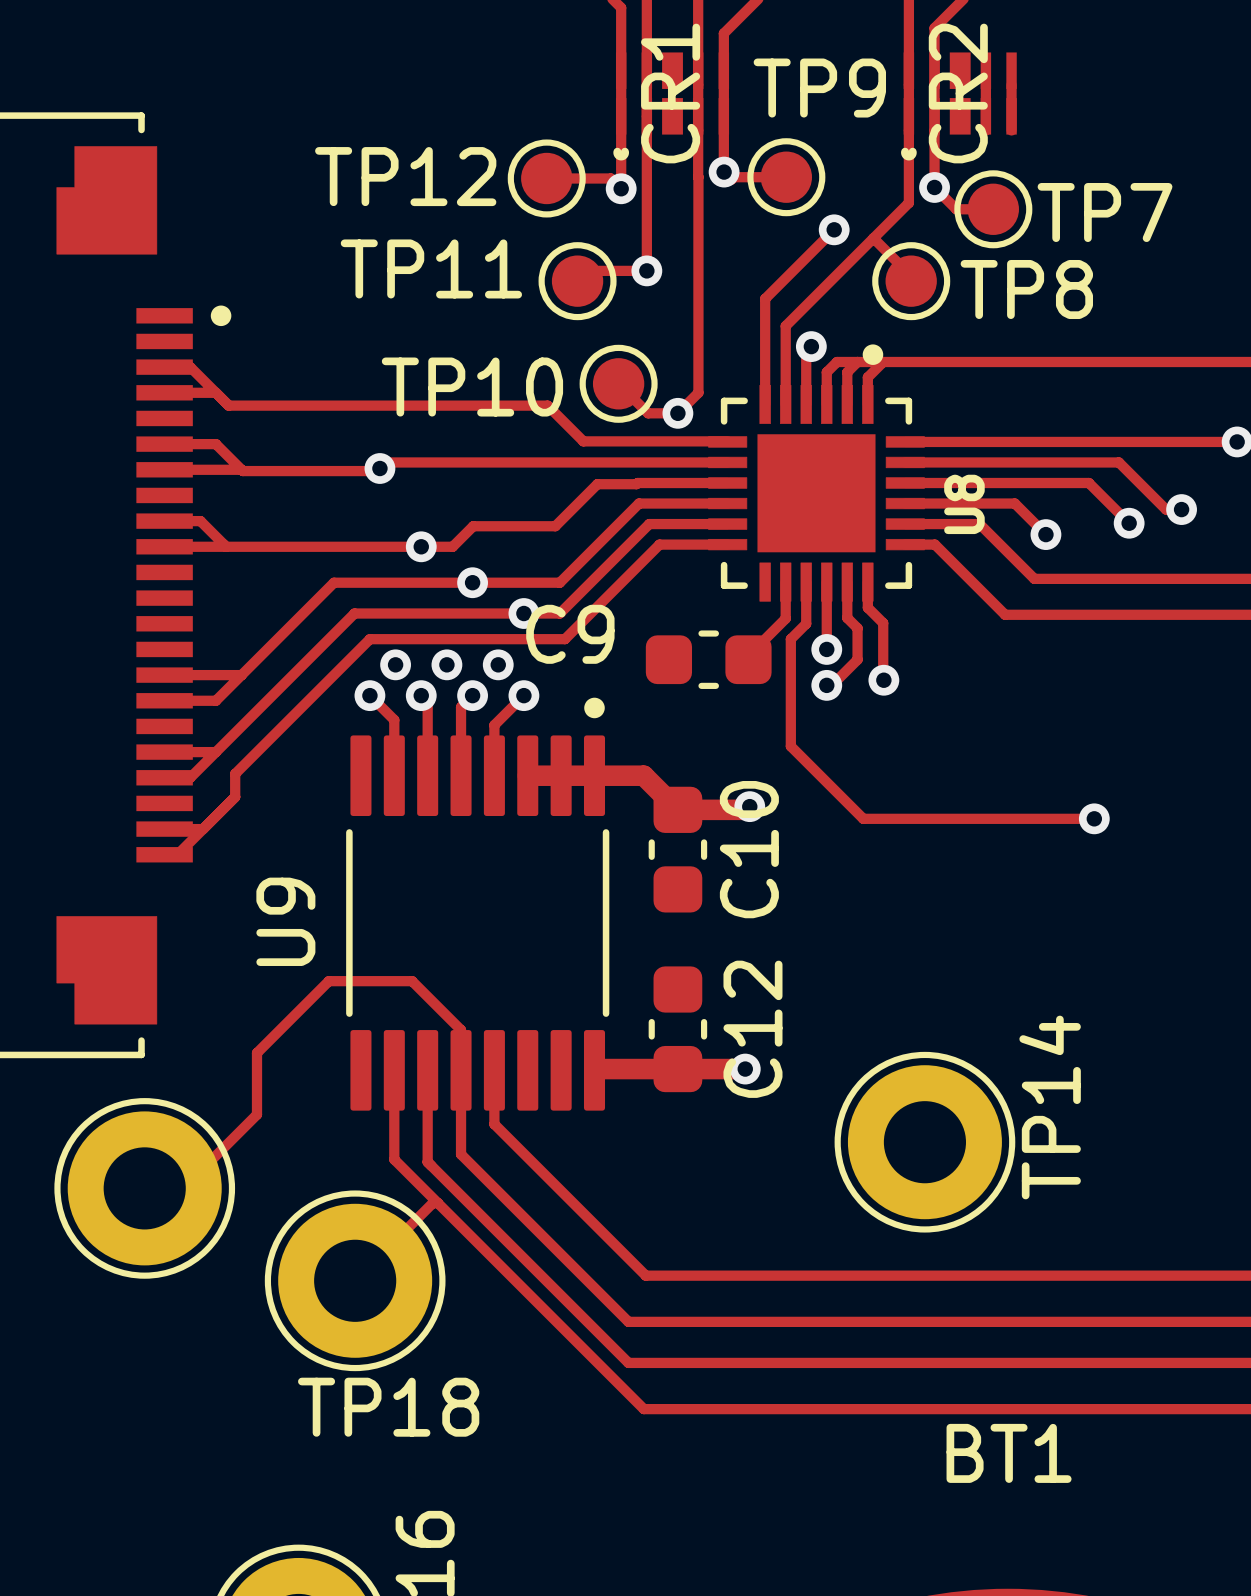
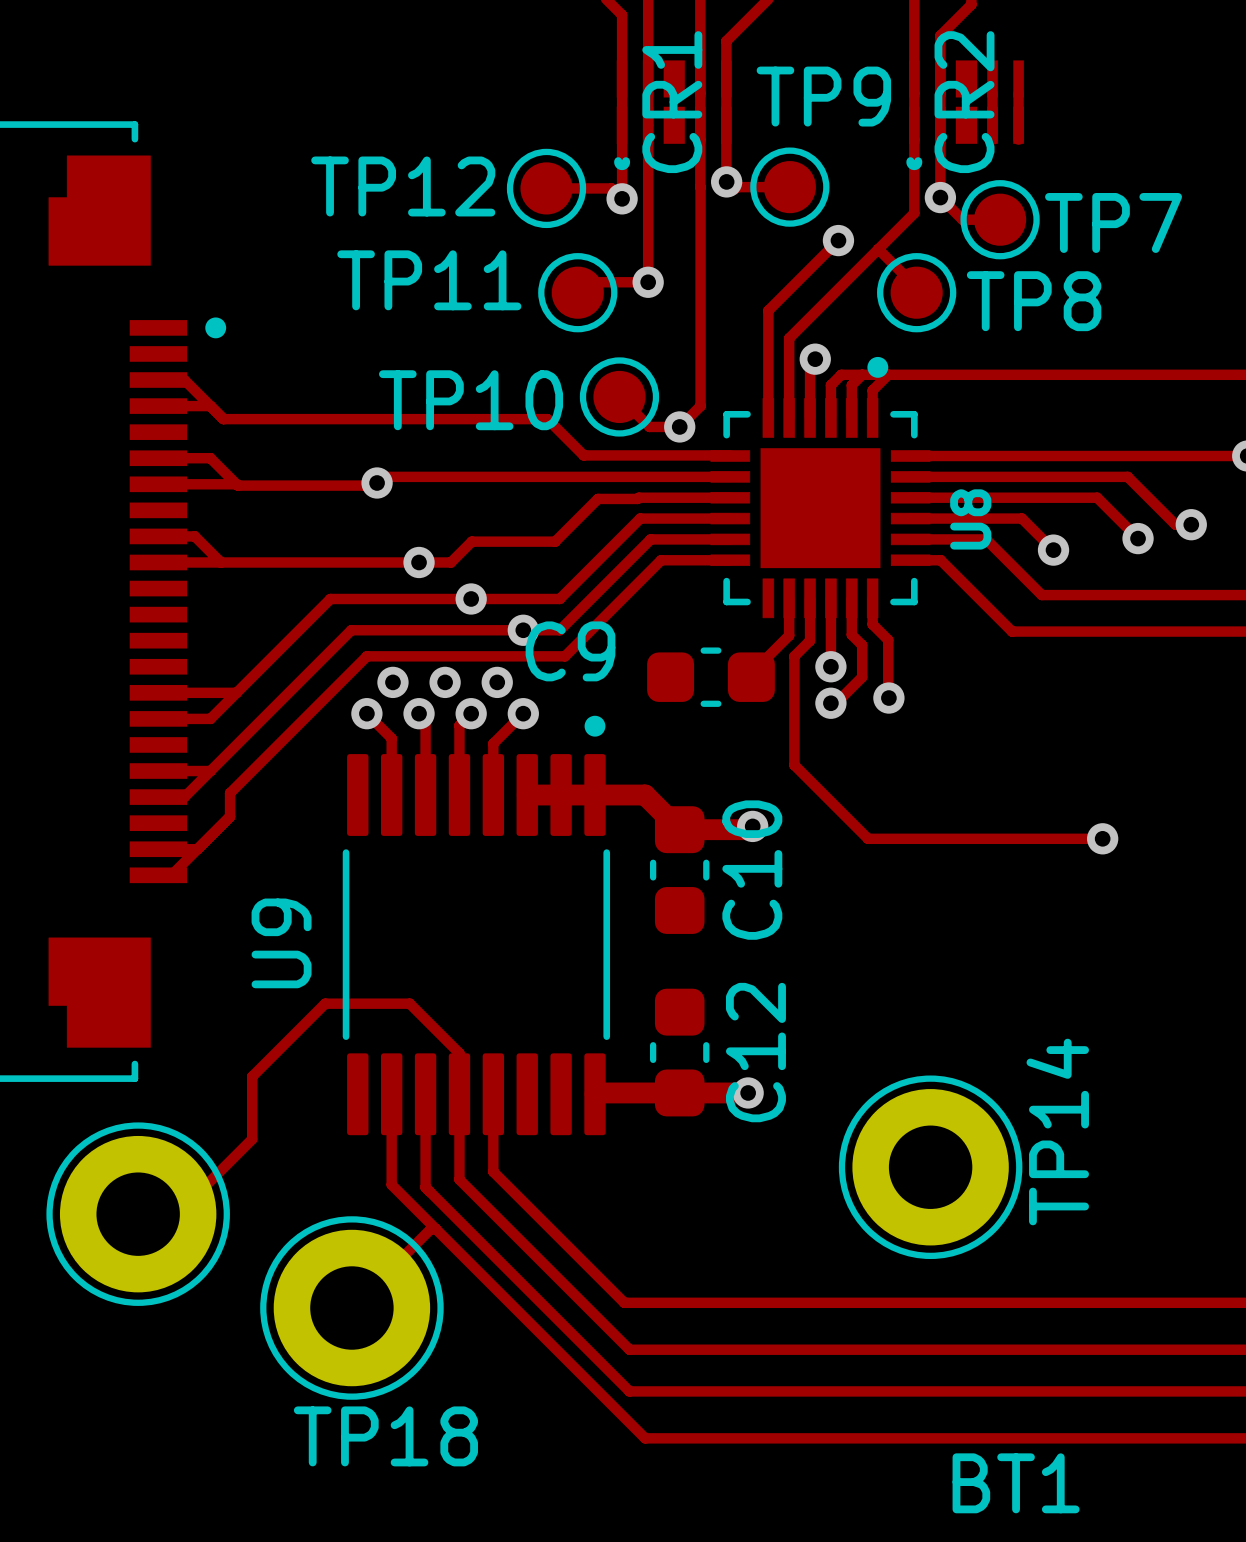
track: (494, 1124) (645, 1275) -> (493, 1149) (493, 1171) (624, 1302) (647, 1302)

